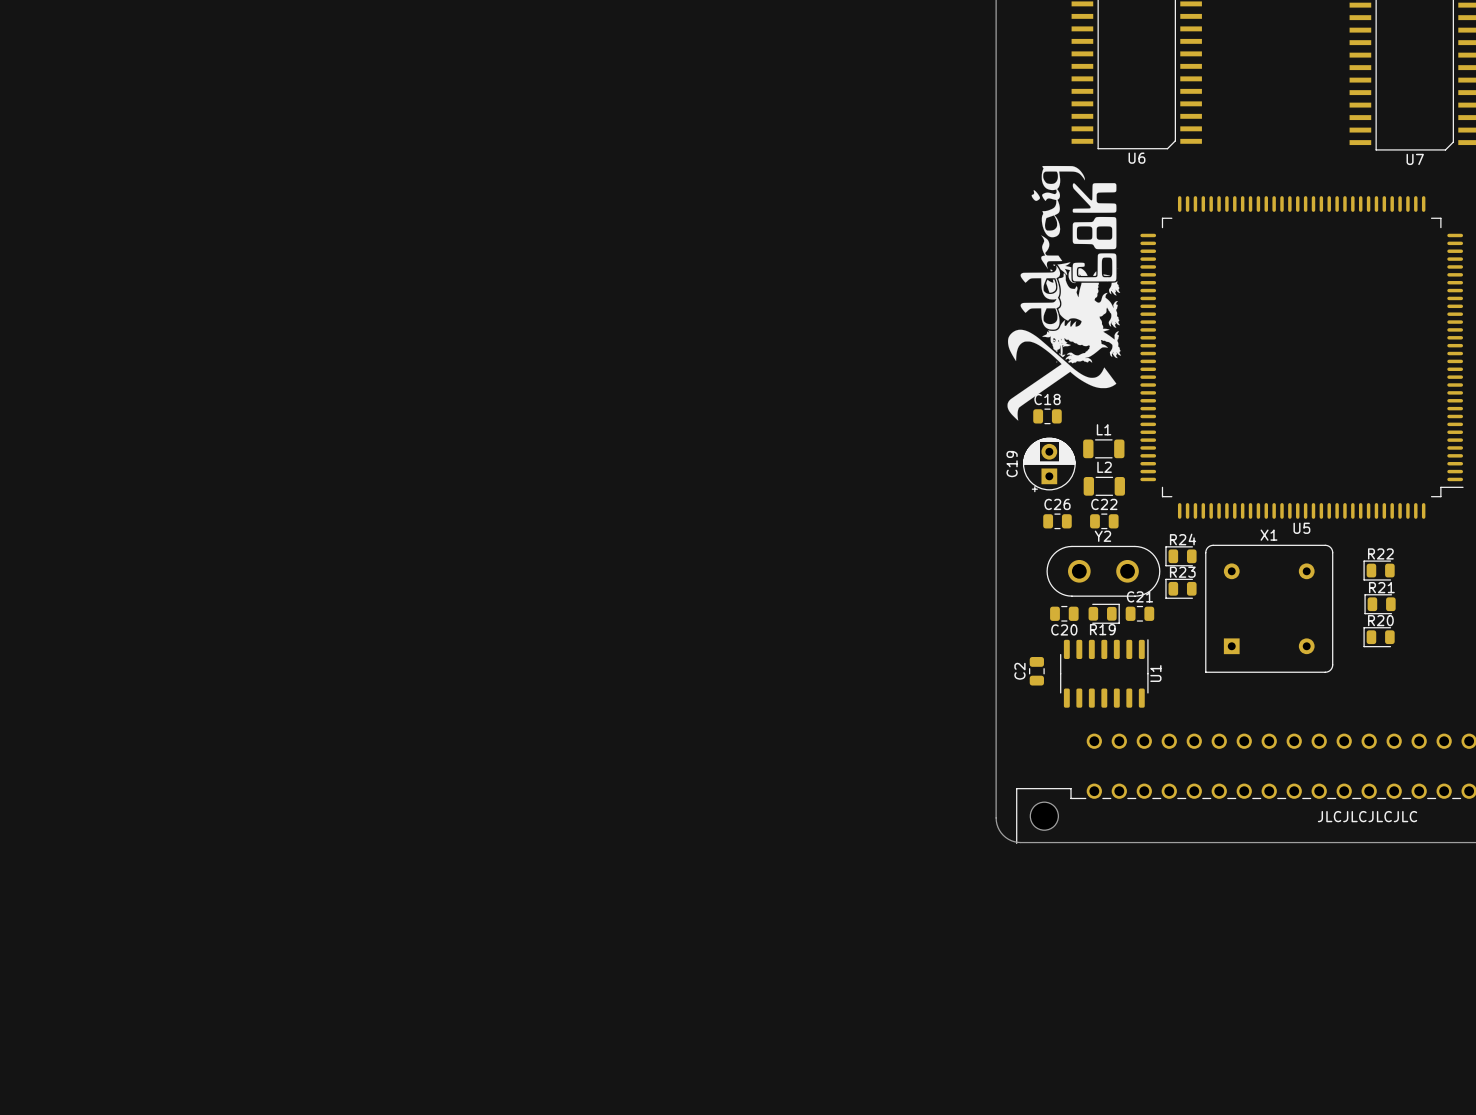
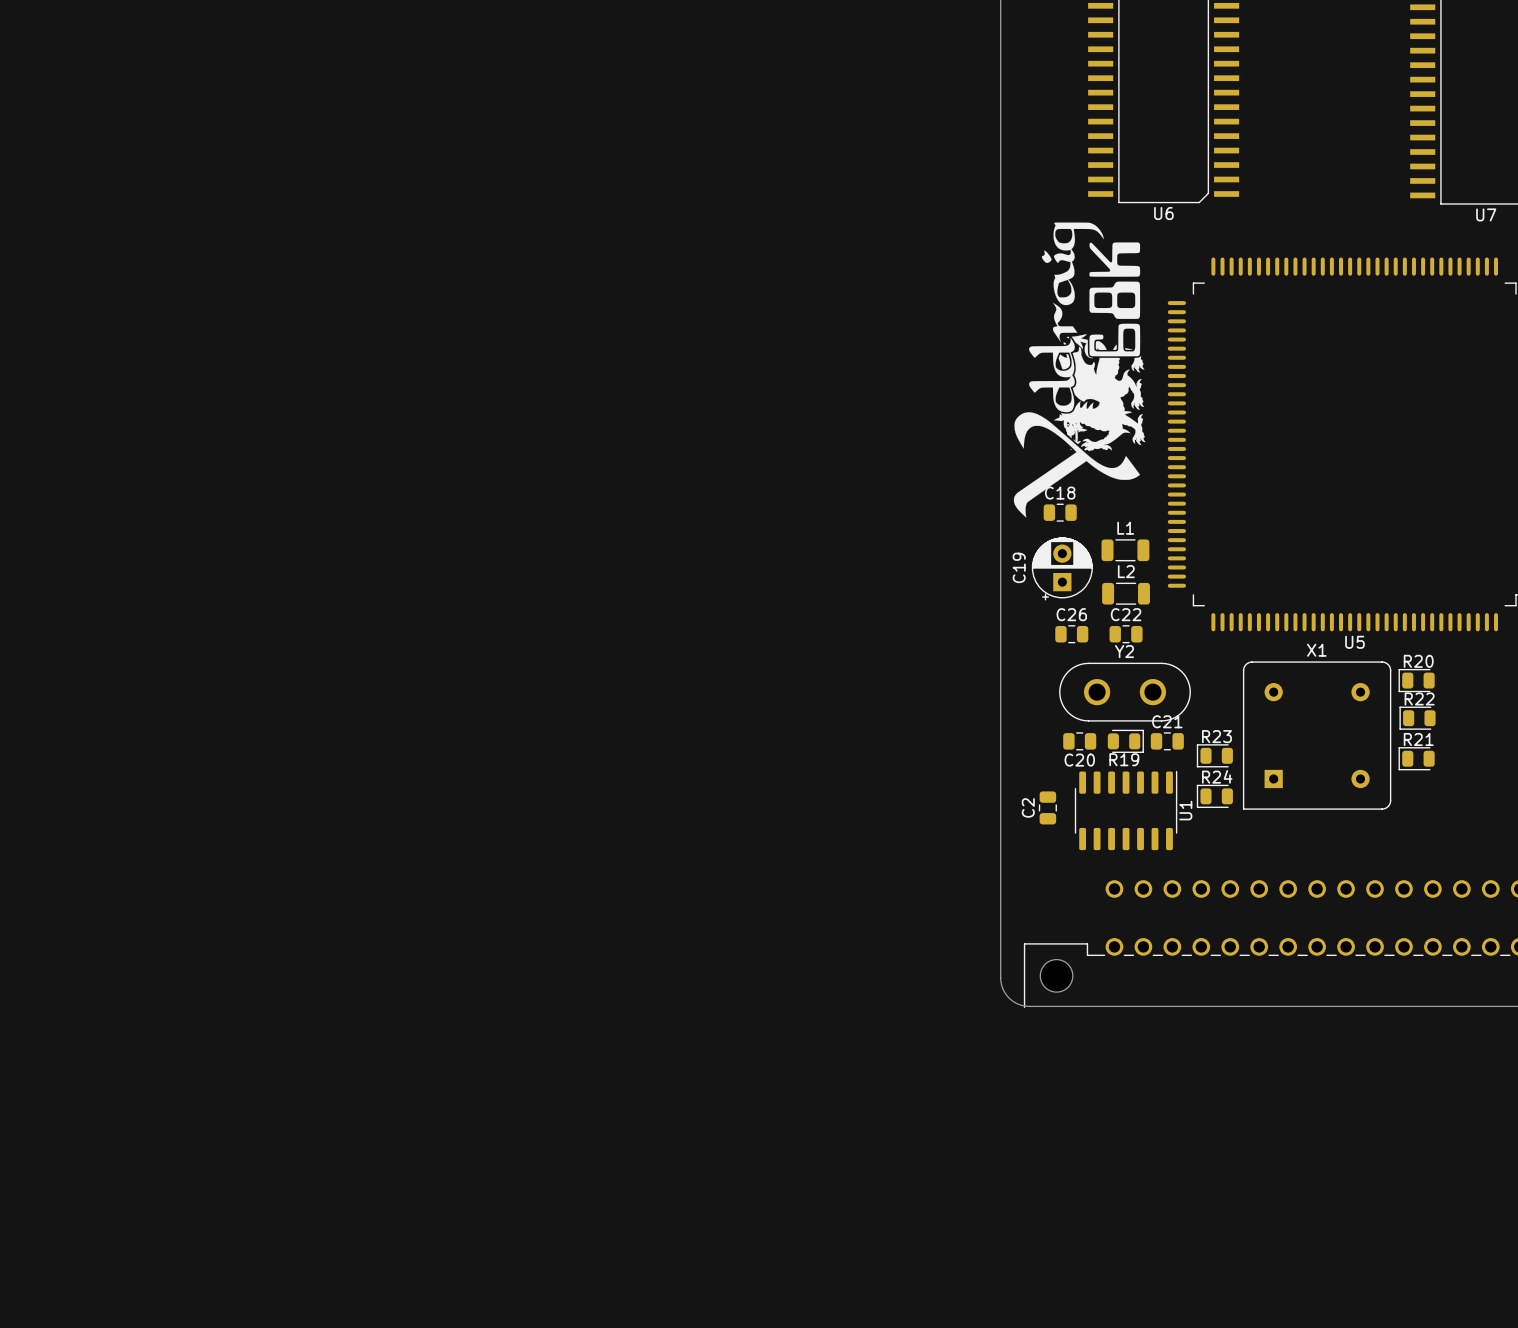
R24 position: (1180, 556) -> (1214, 796)
R22 position: (1379, 570) -> (1417, 718)
R23 position: (1180, 588) -> (1214, 755)
R21 position: (1380, 604) -> (1416, 758)
R20 position: (1379, 637) -> (1416, 680)
text: JLCJLCJLCJLC (1367, 816) -> none

